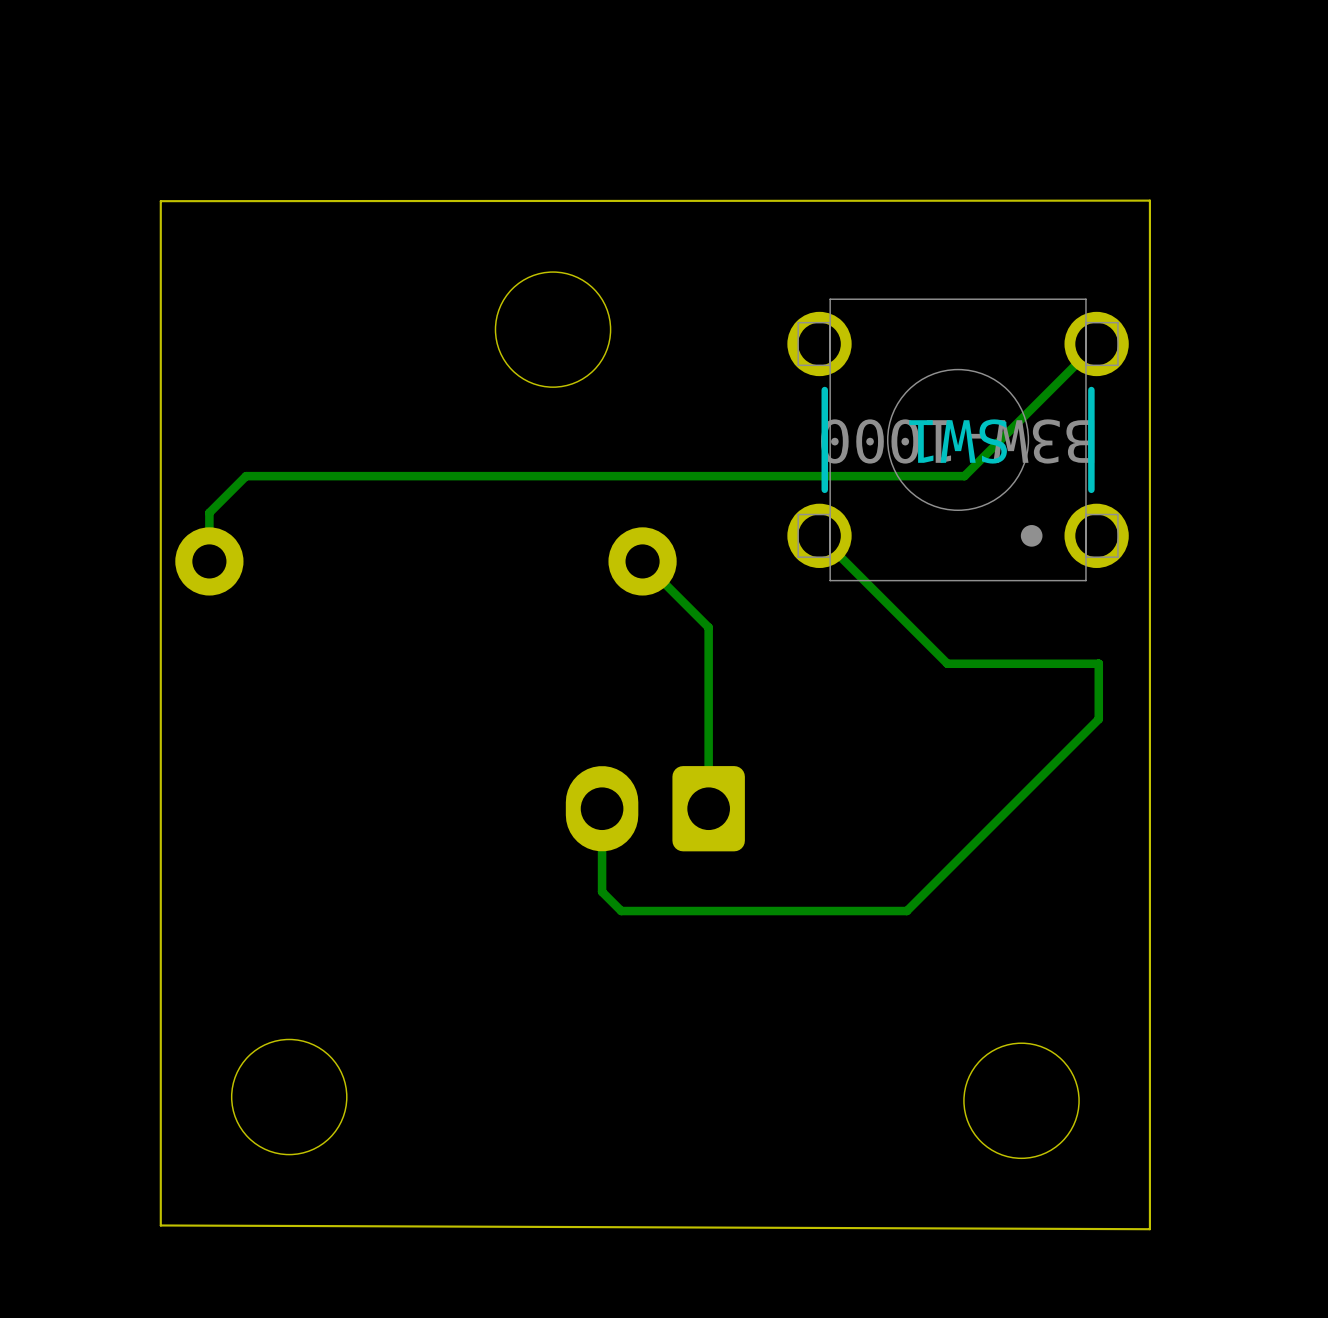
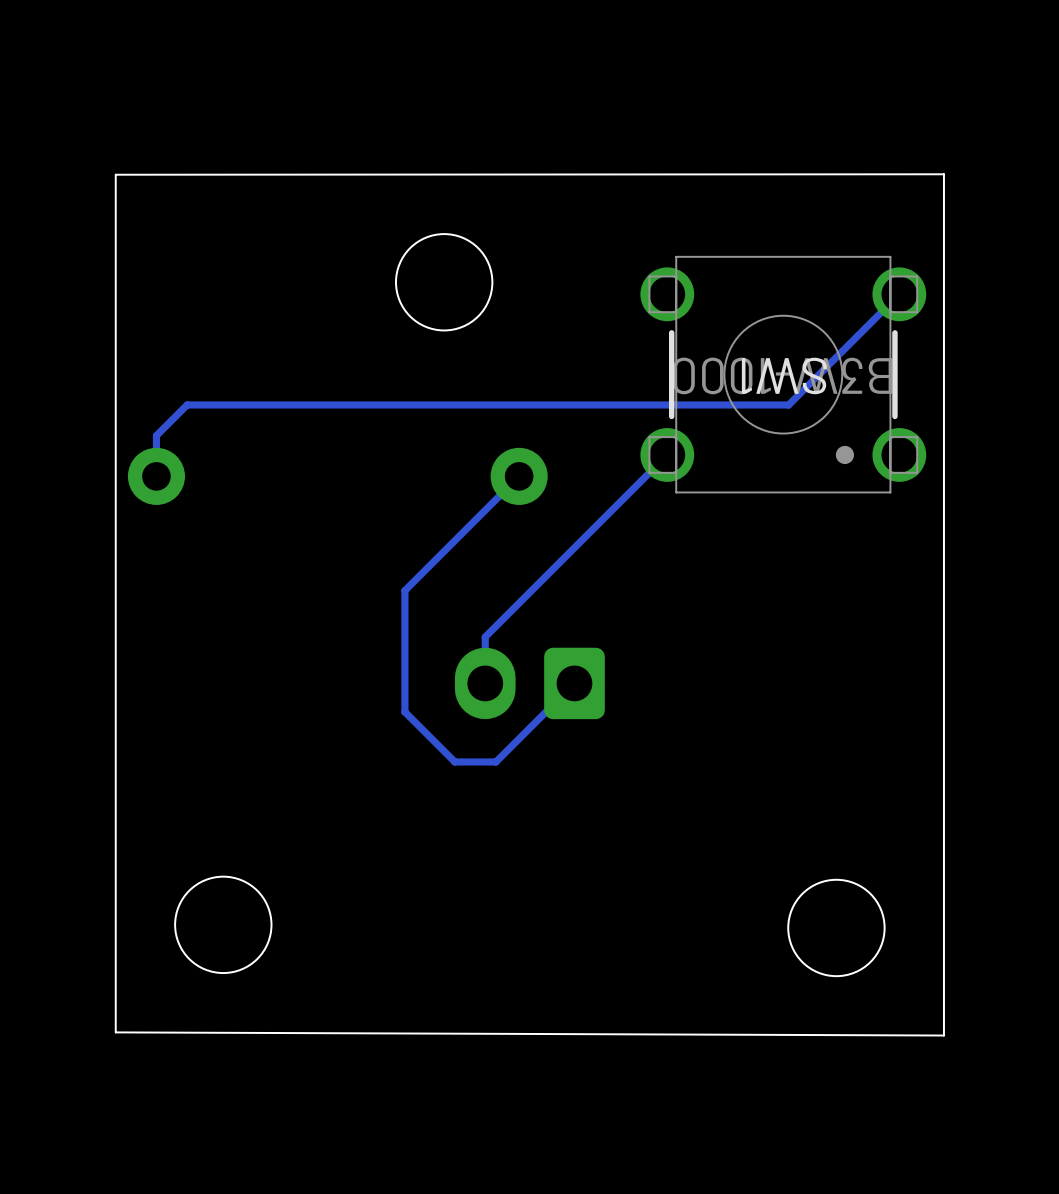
bottom track: (819, 535) (947, 663) (1098, 663) (1098, 719) (906, 911) (621, 911) (602, 891) (602, 808) -> (667, 454) (485, 637) (485, 683)
bottom track: (642, 561) (708, 627) (708, 808) -> (519, 476) (404, 590) (404, 711) (454, 761) (495, 761) (574, 683)

